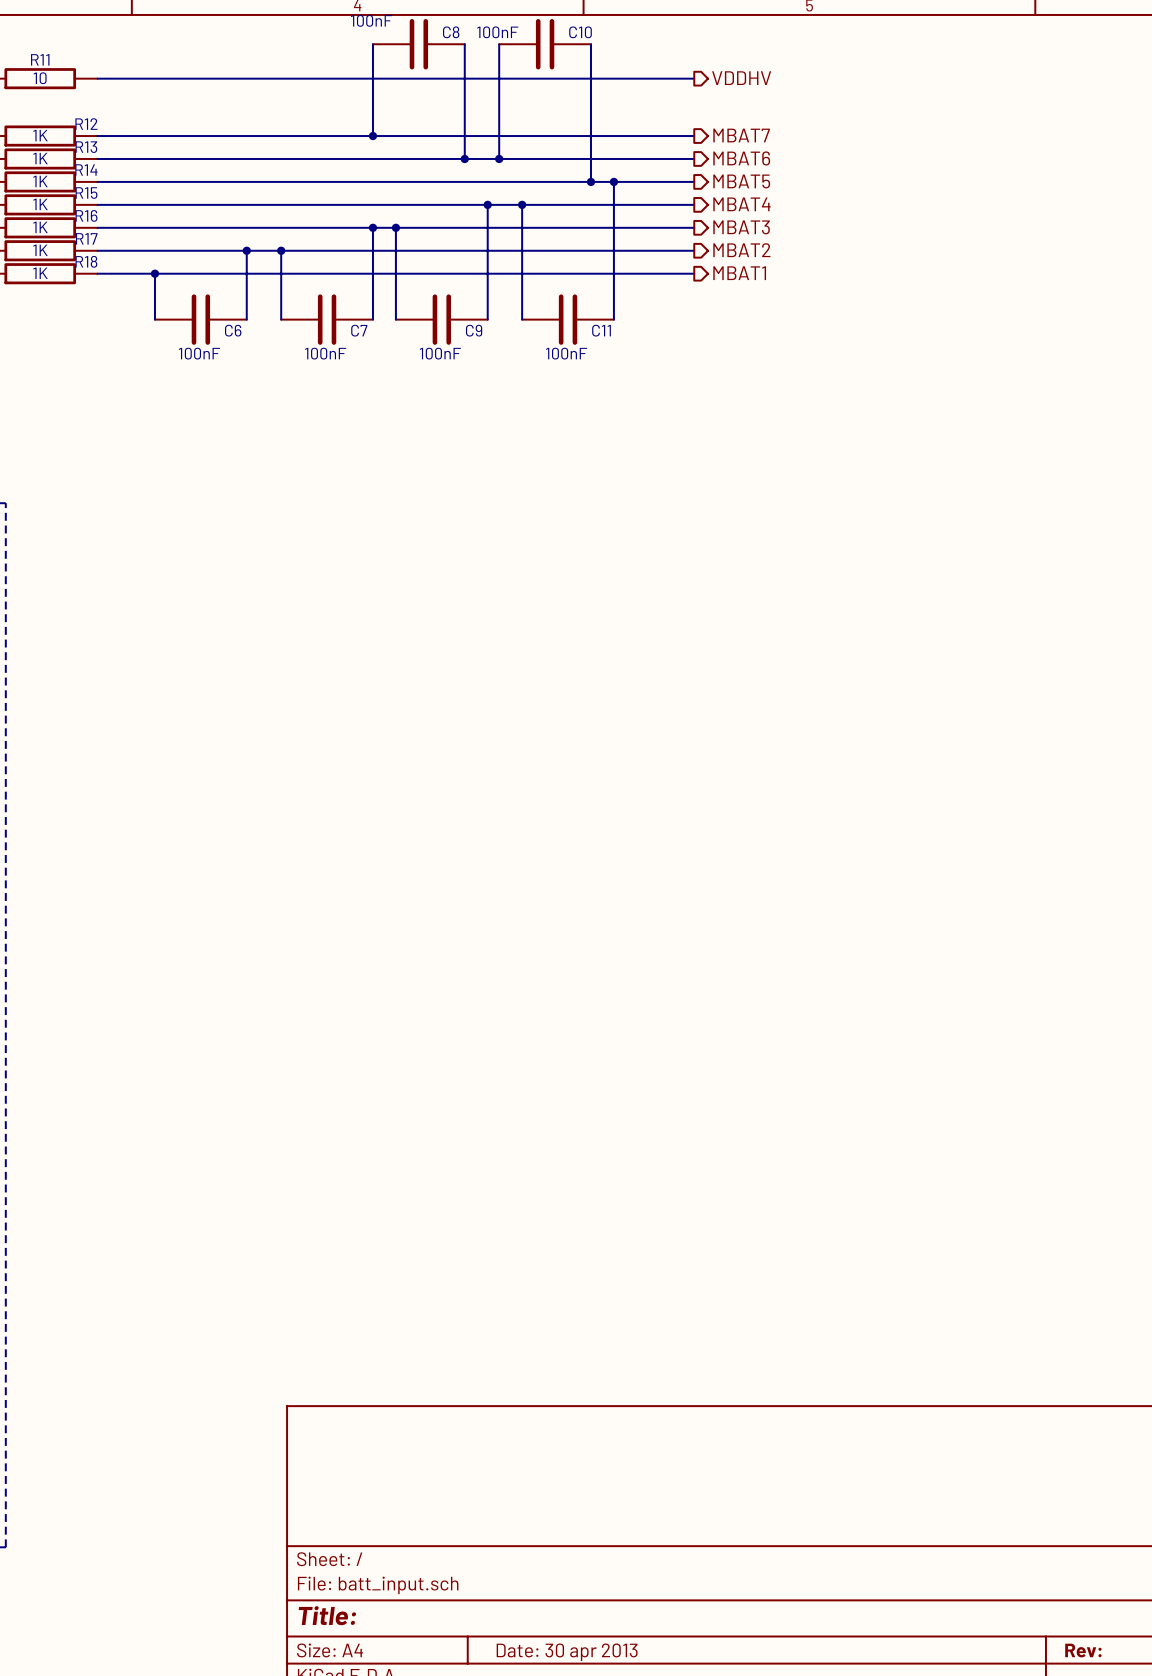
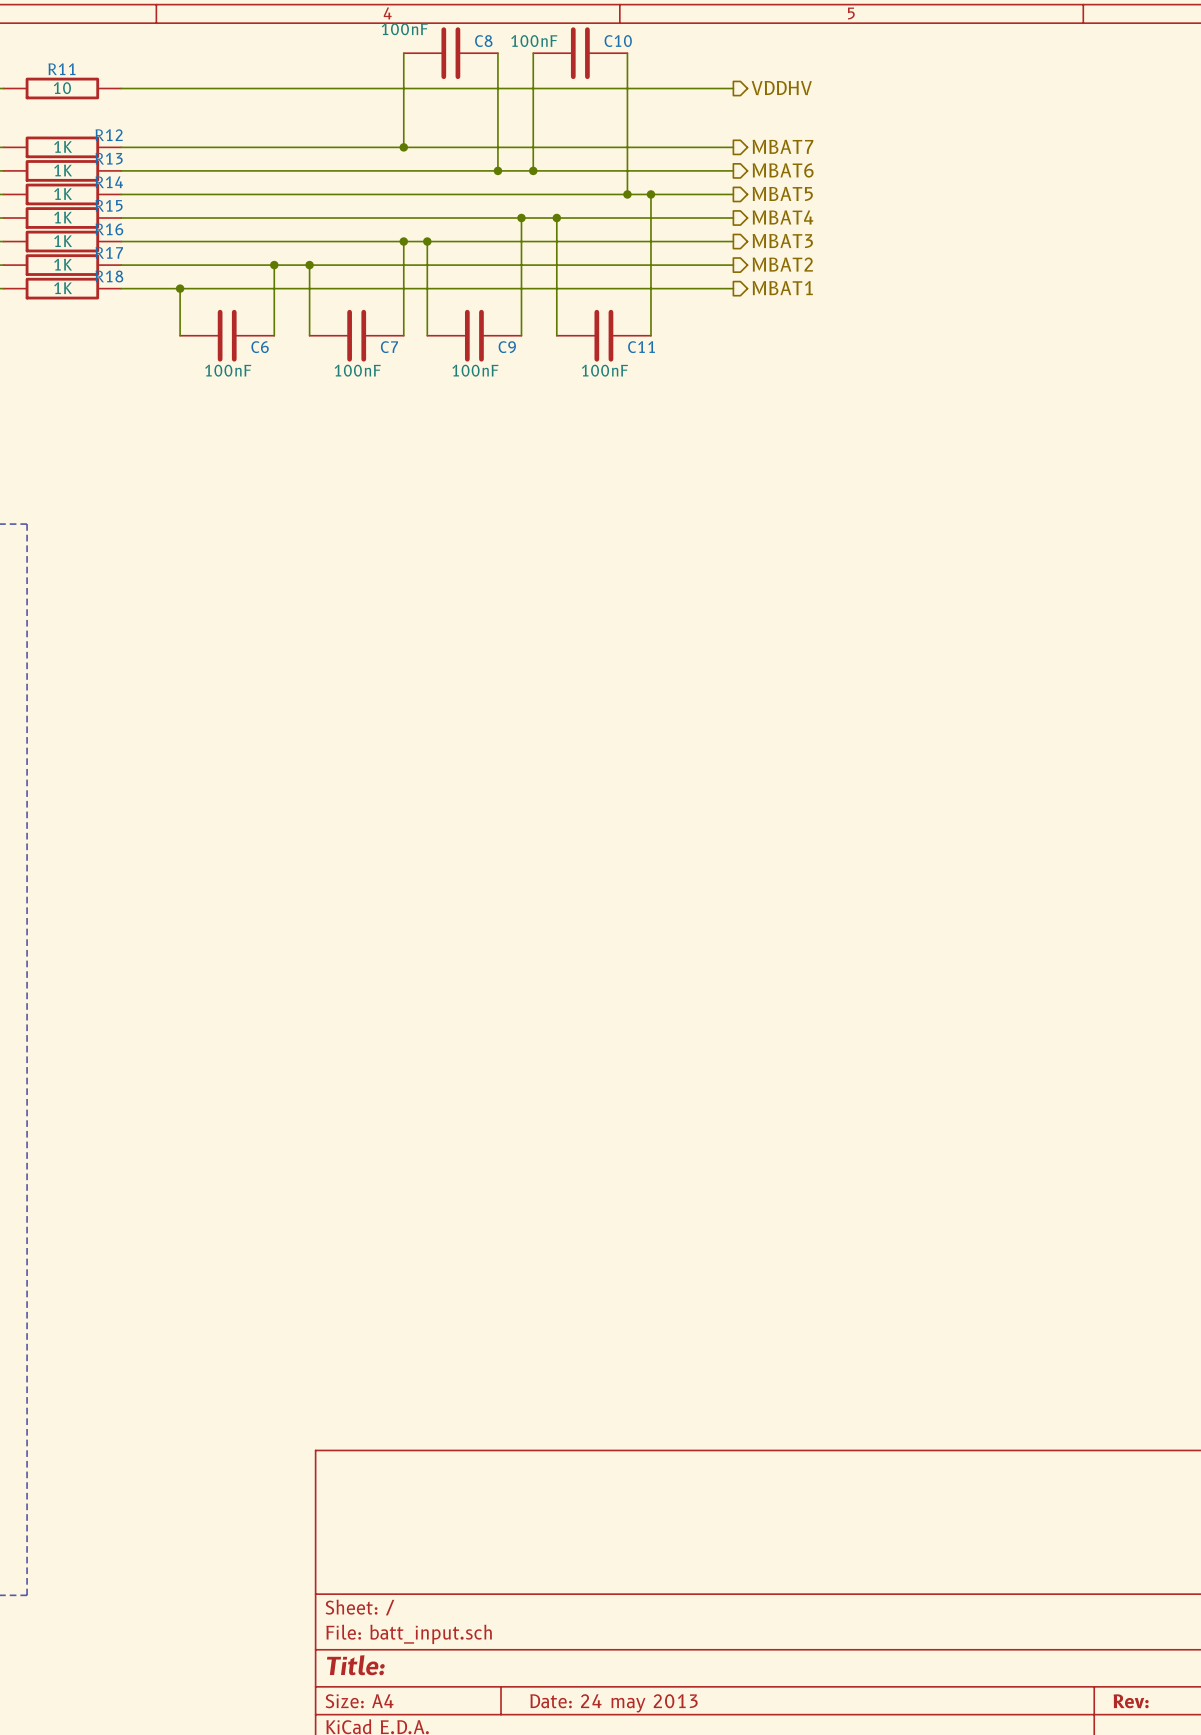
title block: Date: 30 apr 2013 (567, 1652) -> Date: 24 may 2013 (614, 1703)

